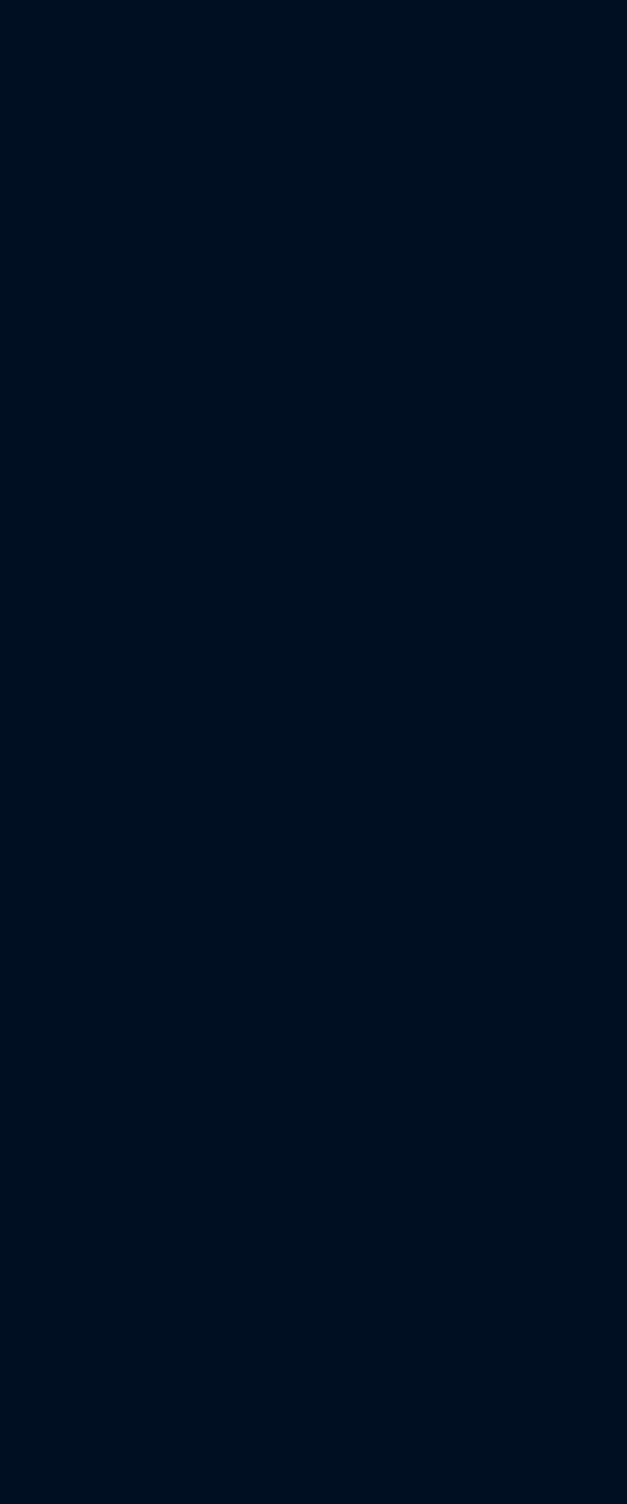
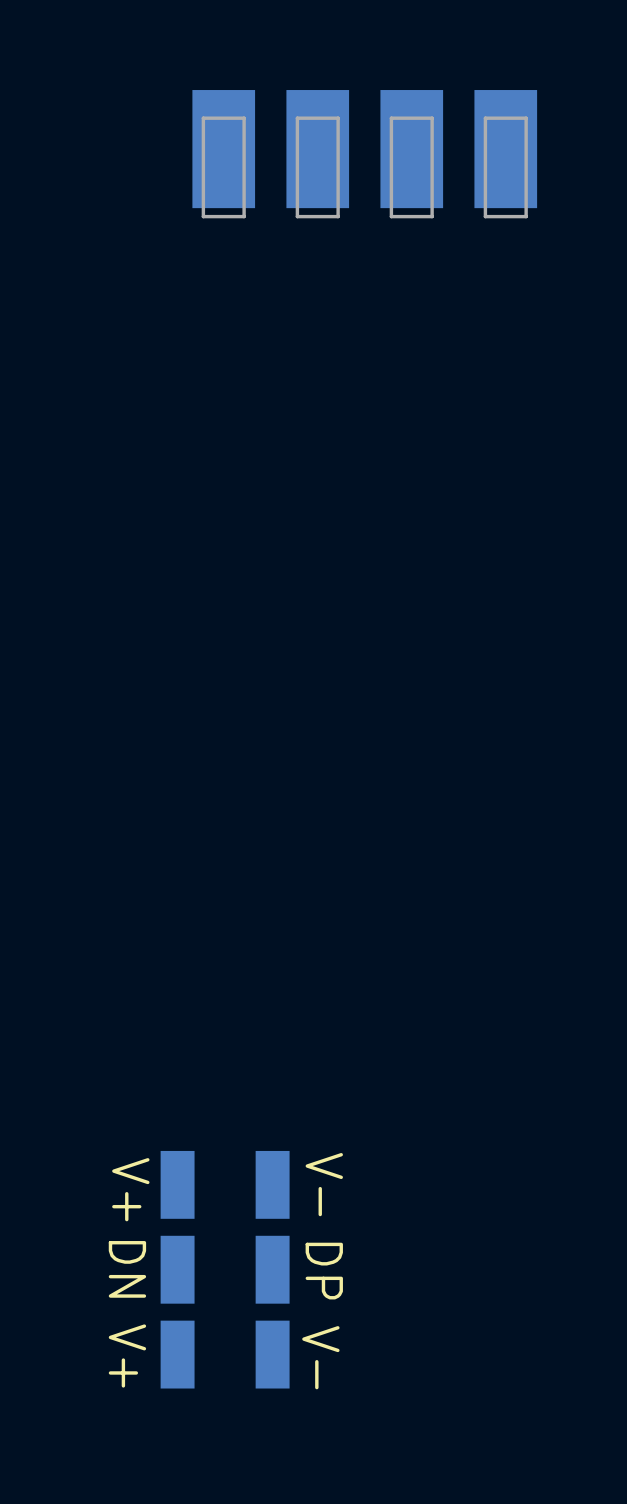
part: none -> (364, 154)
part: none -> (225, 1269)

